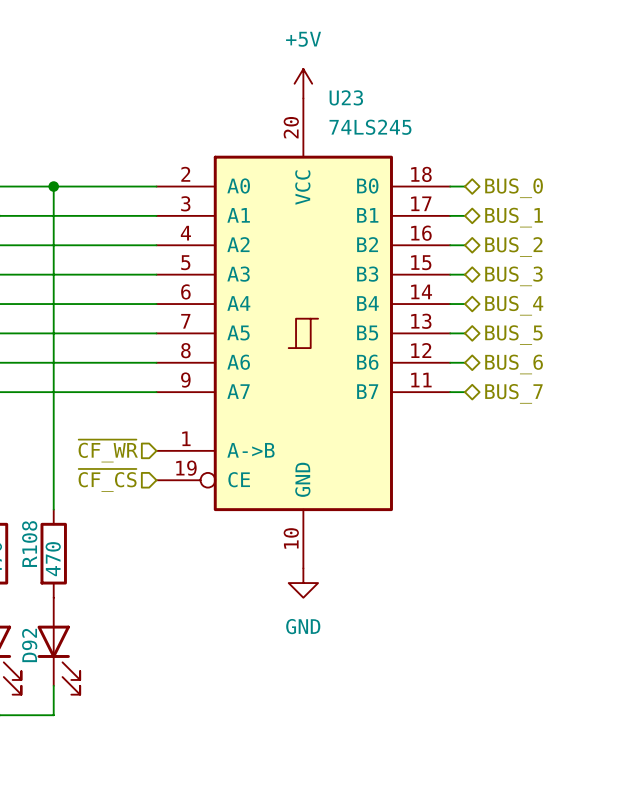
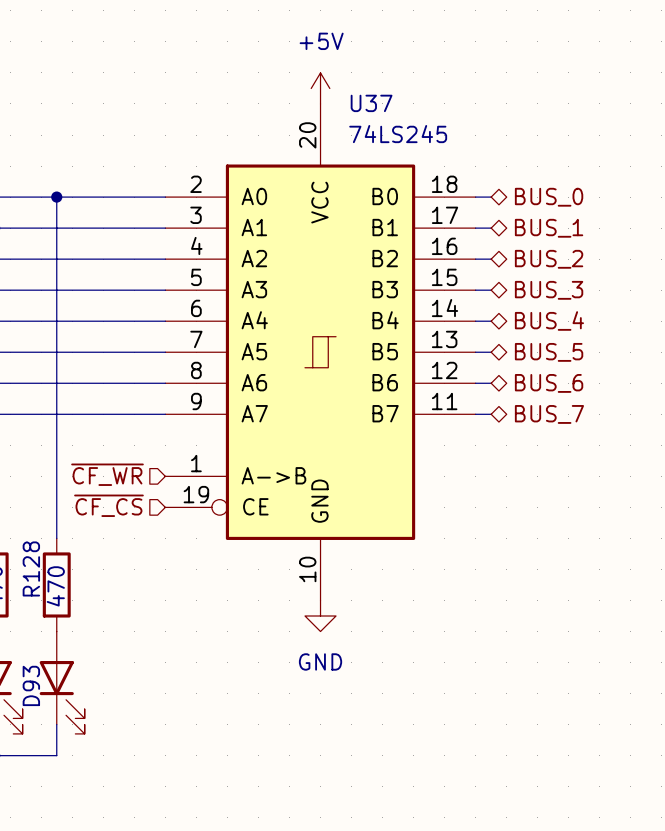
U23 name: U23 (346, 97) -> U37 (371, 103)
R108 name: R108 (29, 544) -> R128 (31, 568)
D92 name: D92 (29, 645) -> D93 (31, 685)

